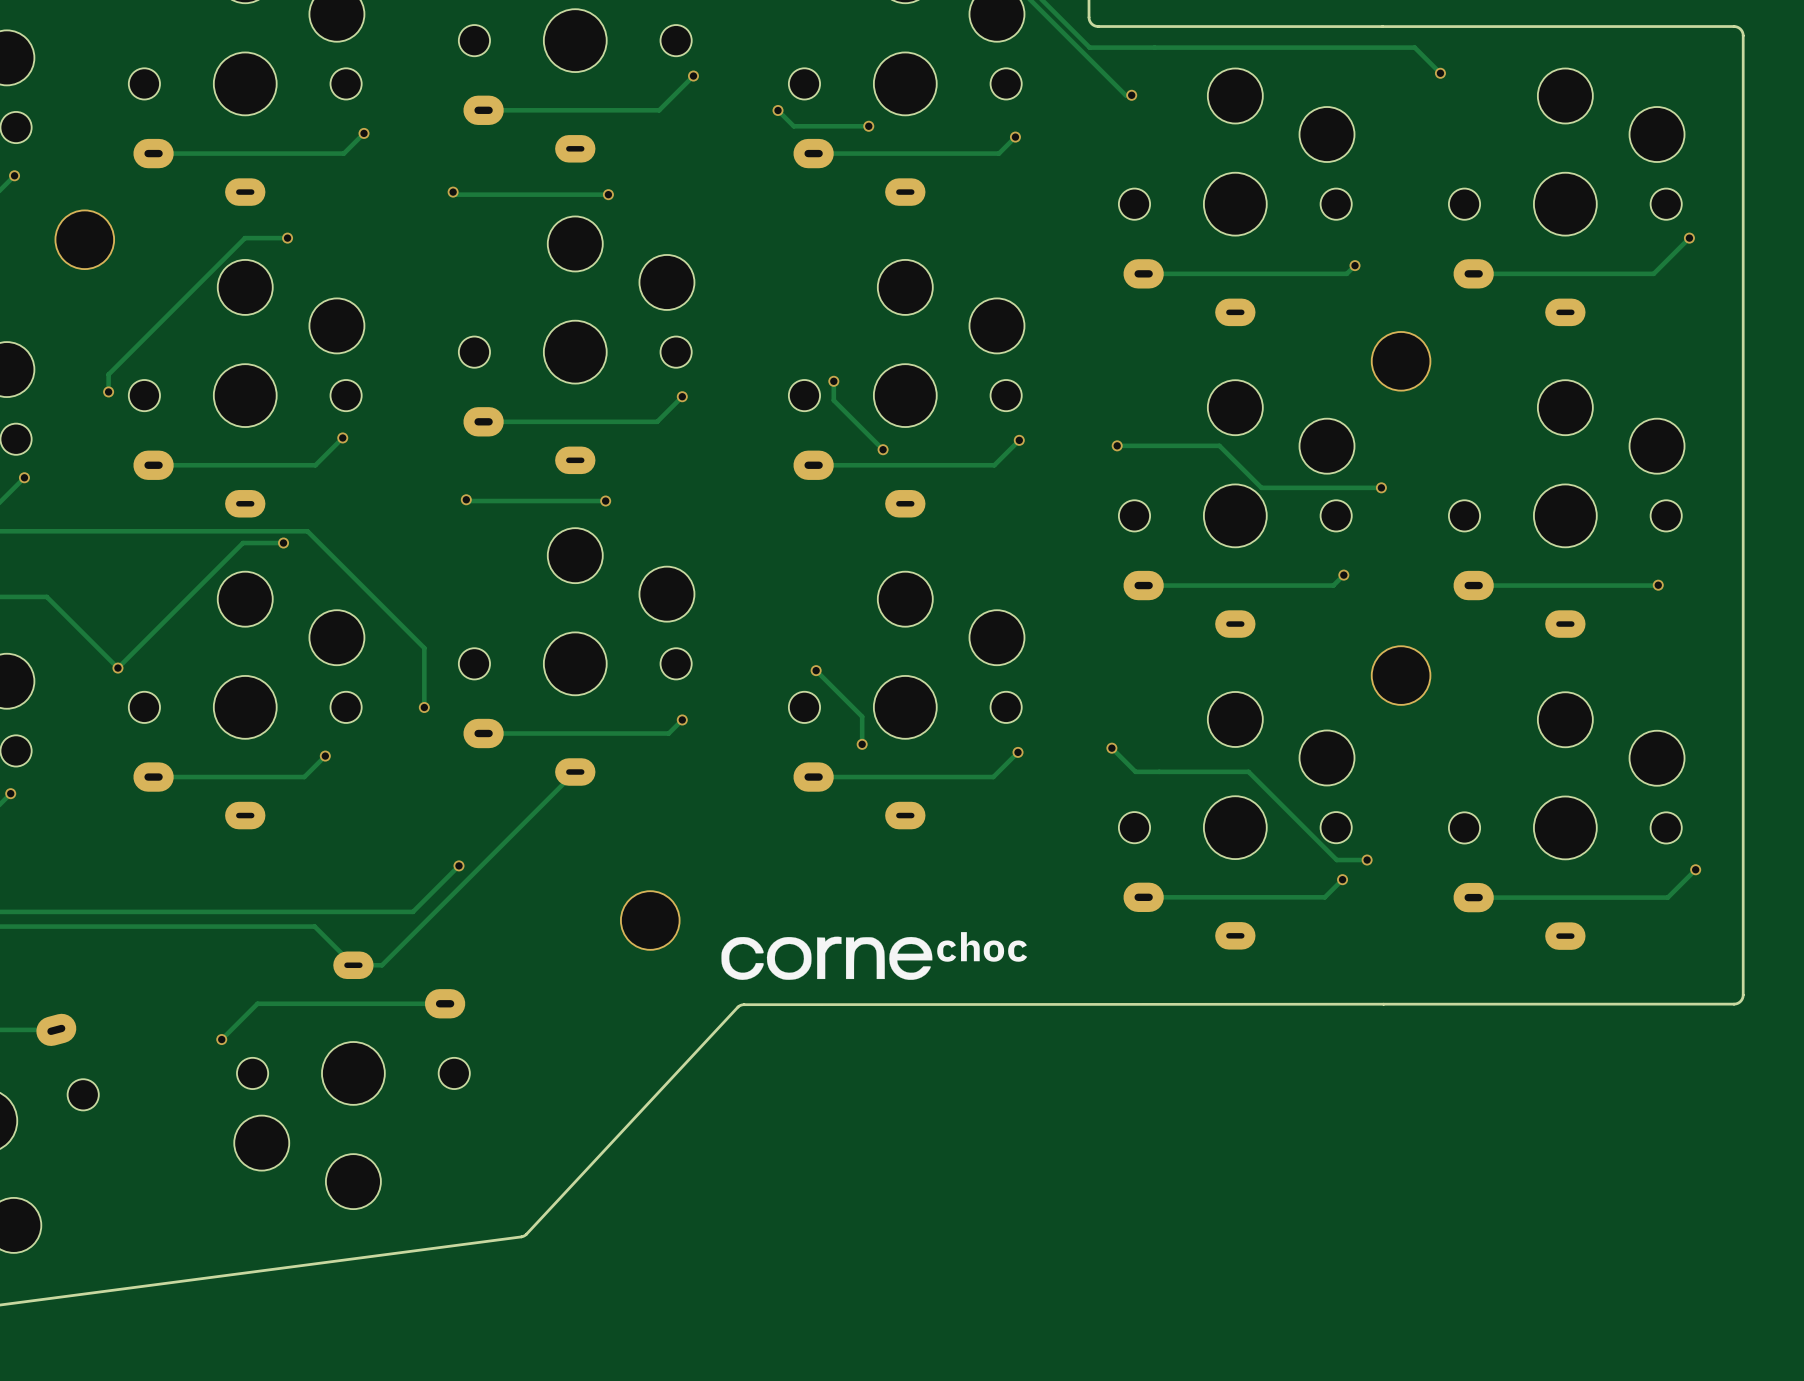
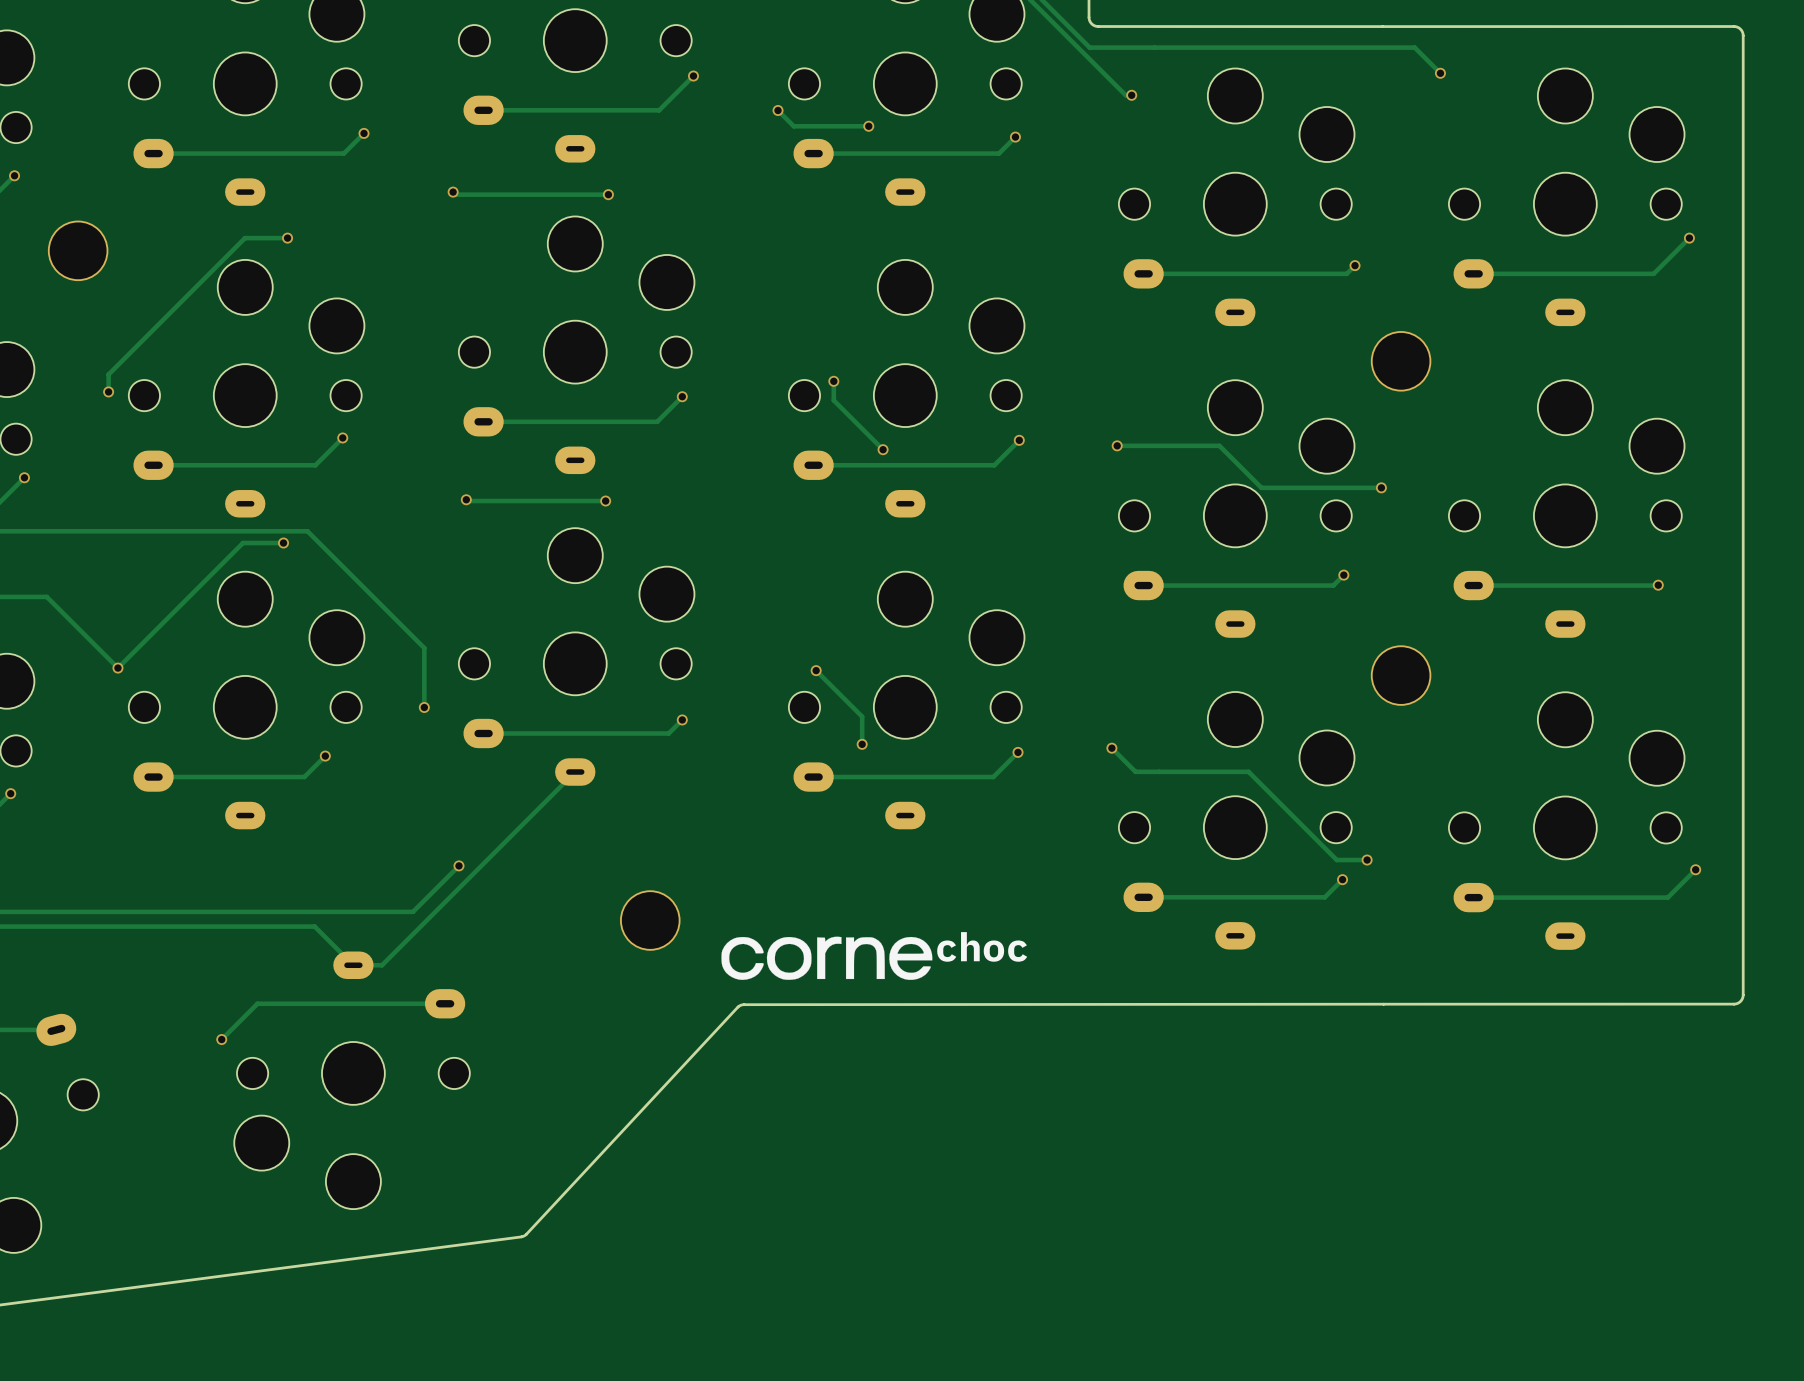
part position: (84, 239) -> (78, 250)

